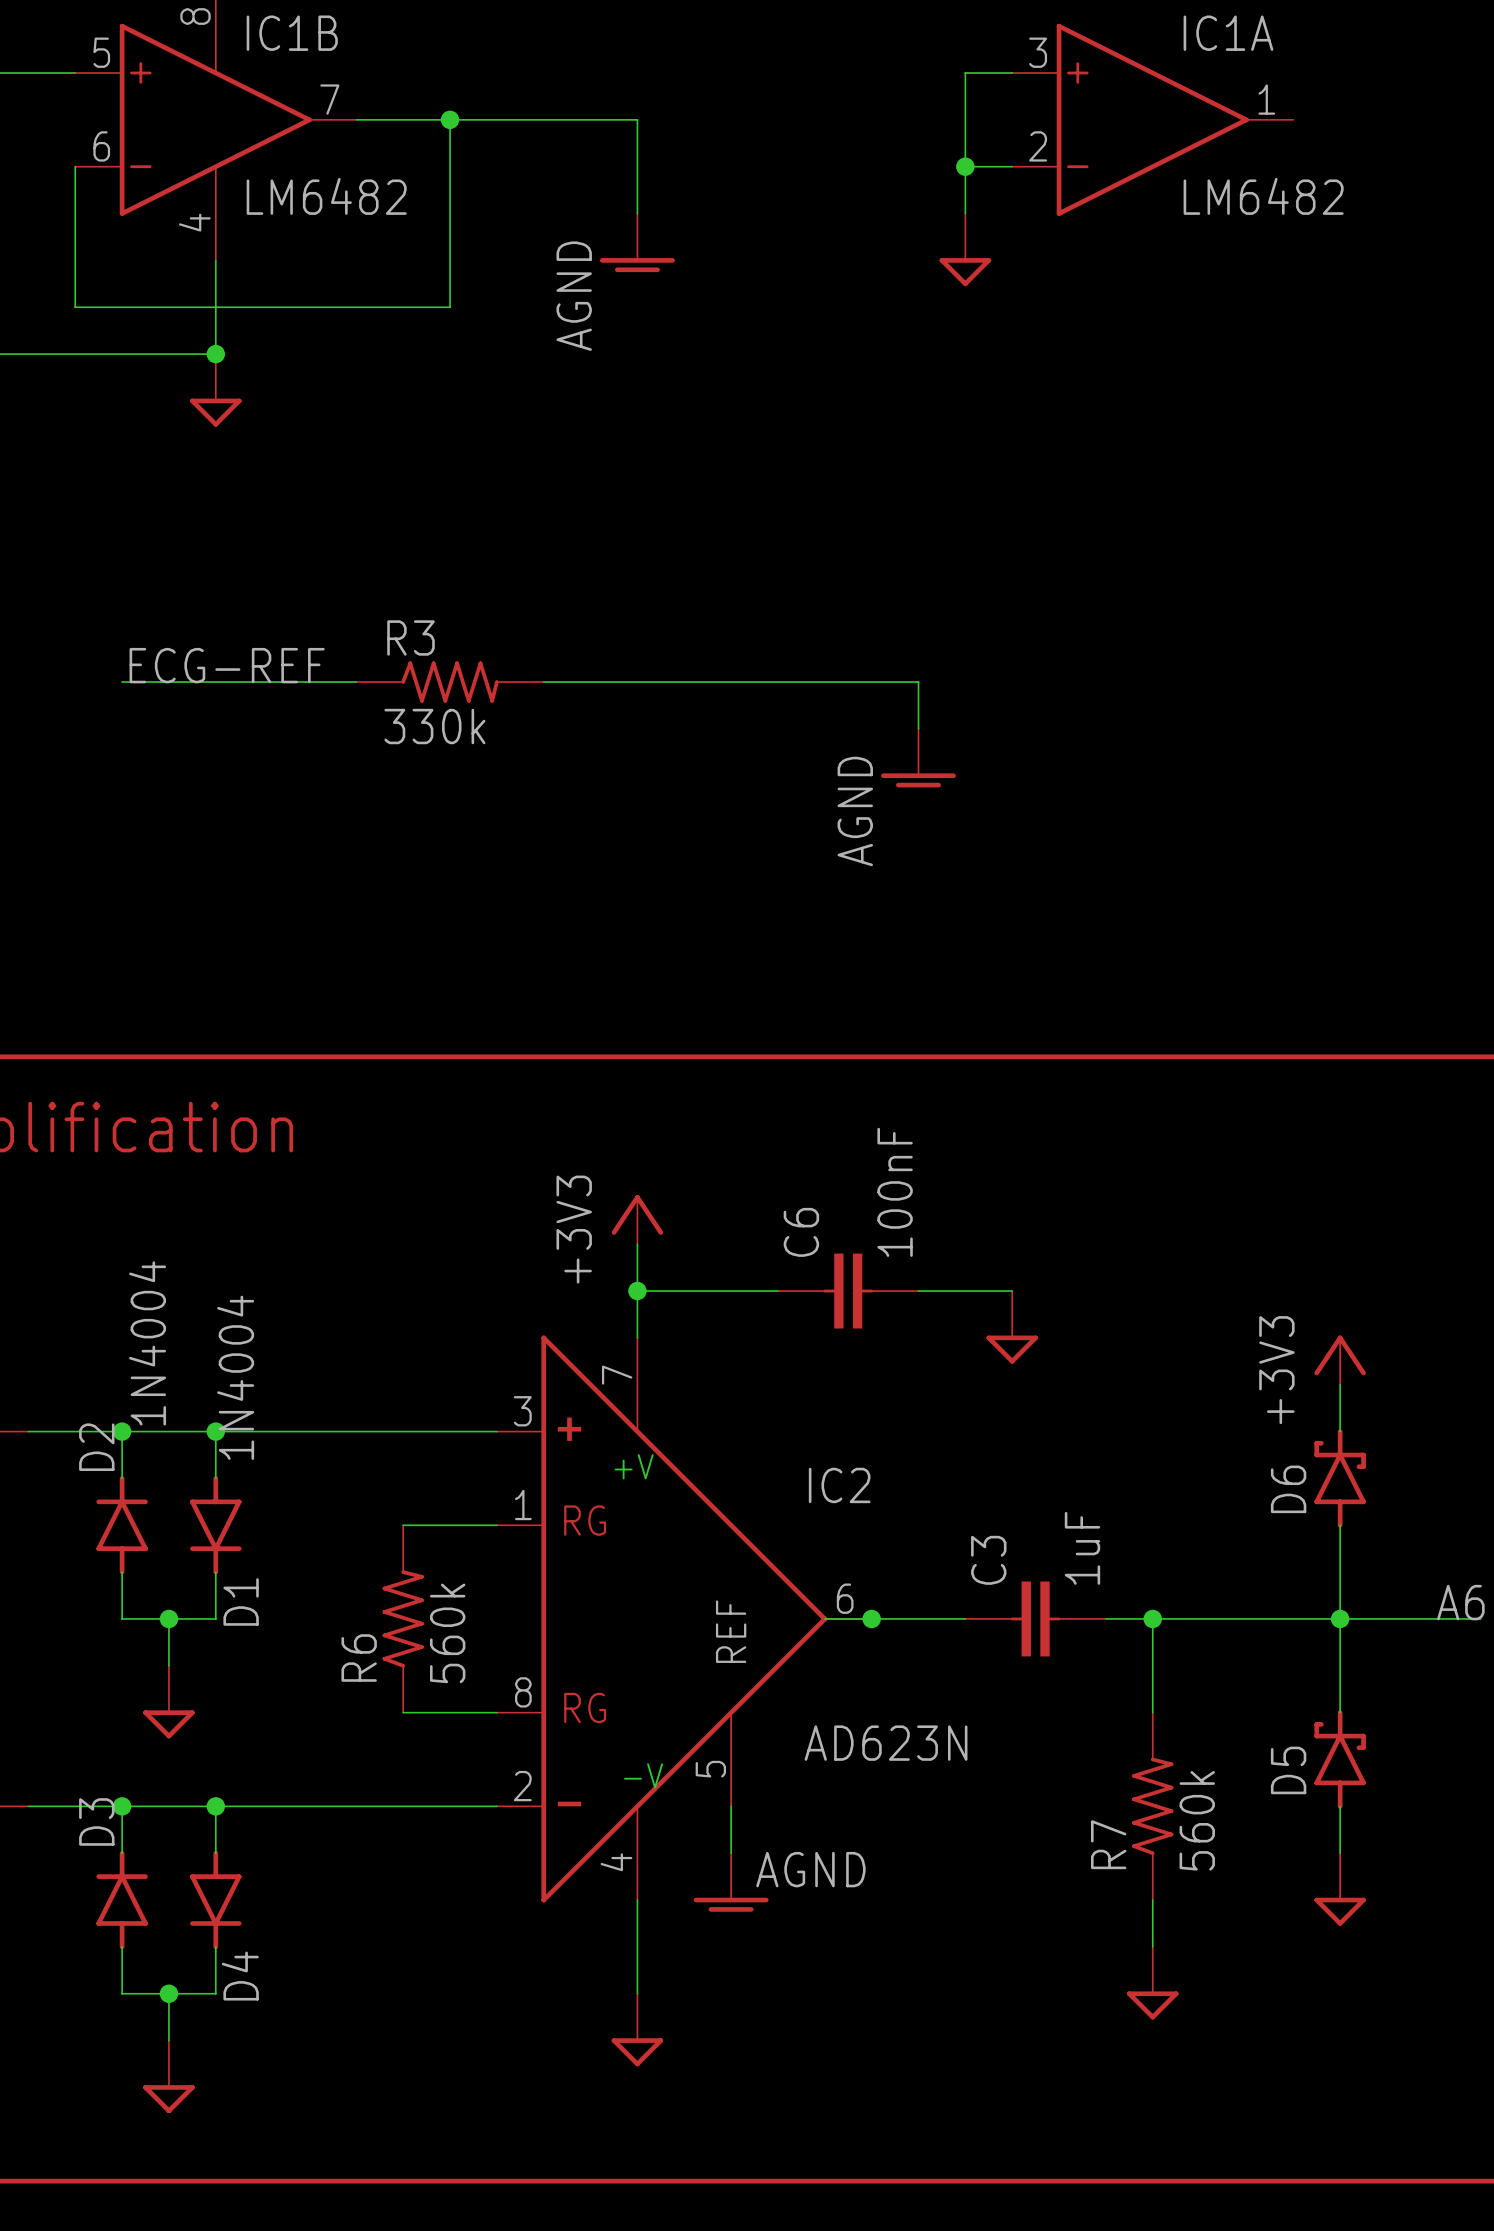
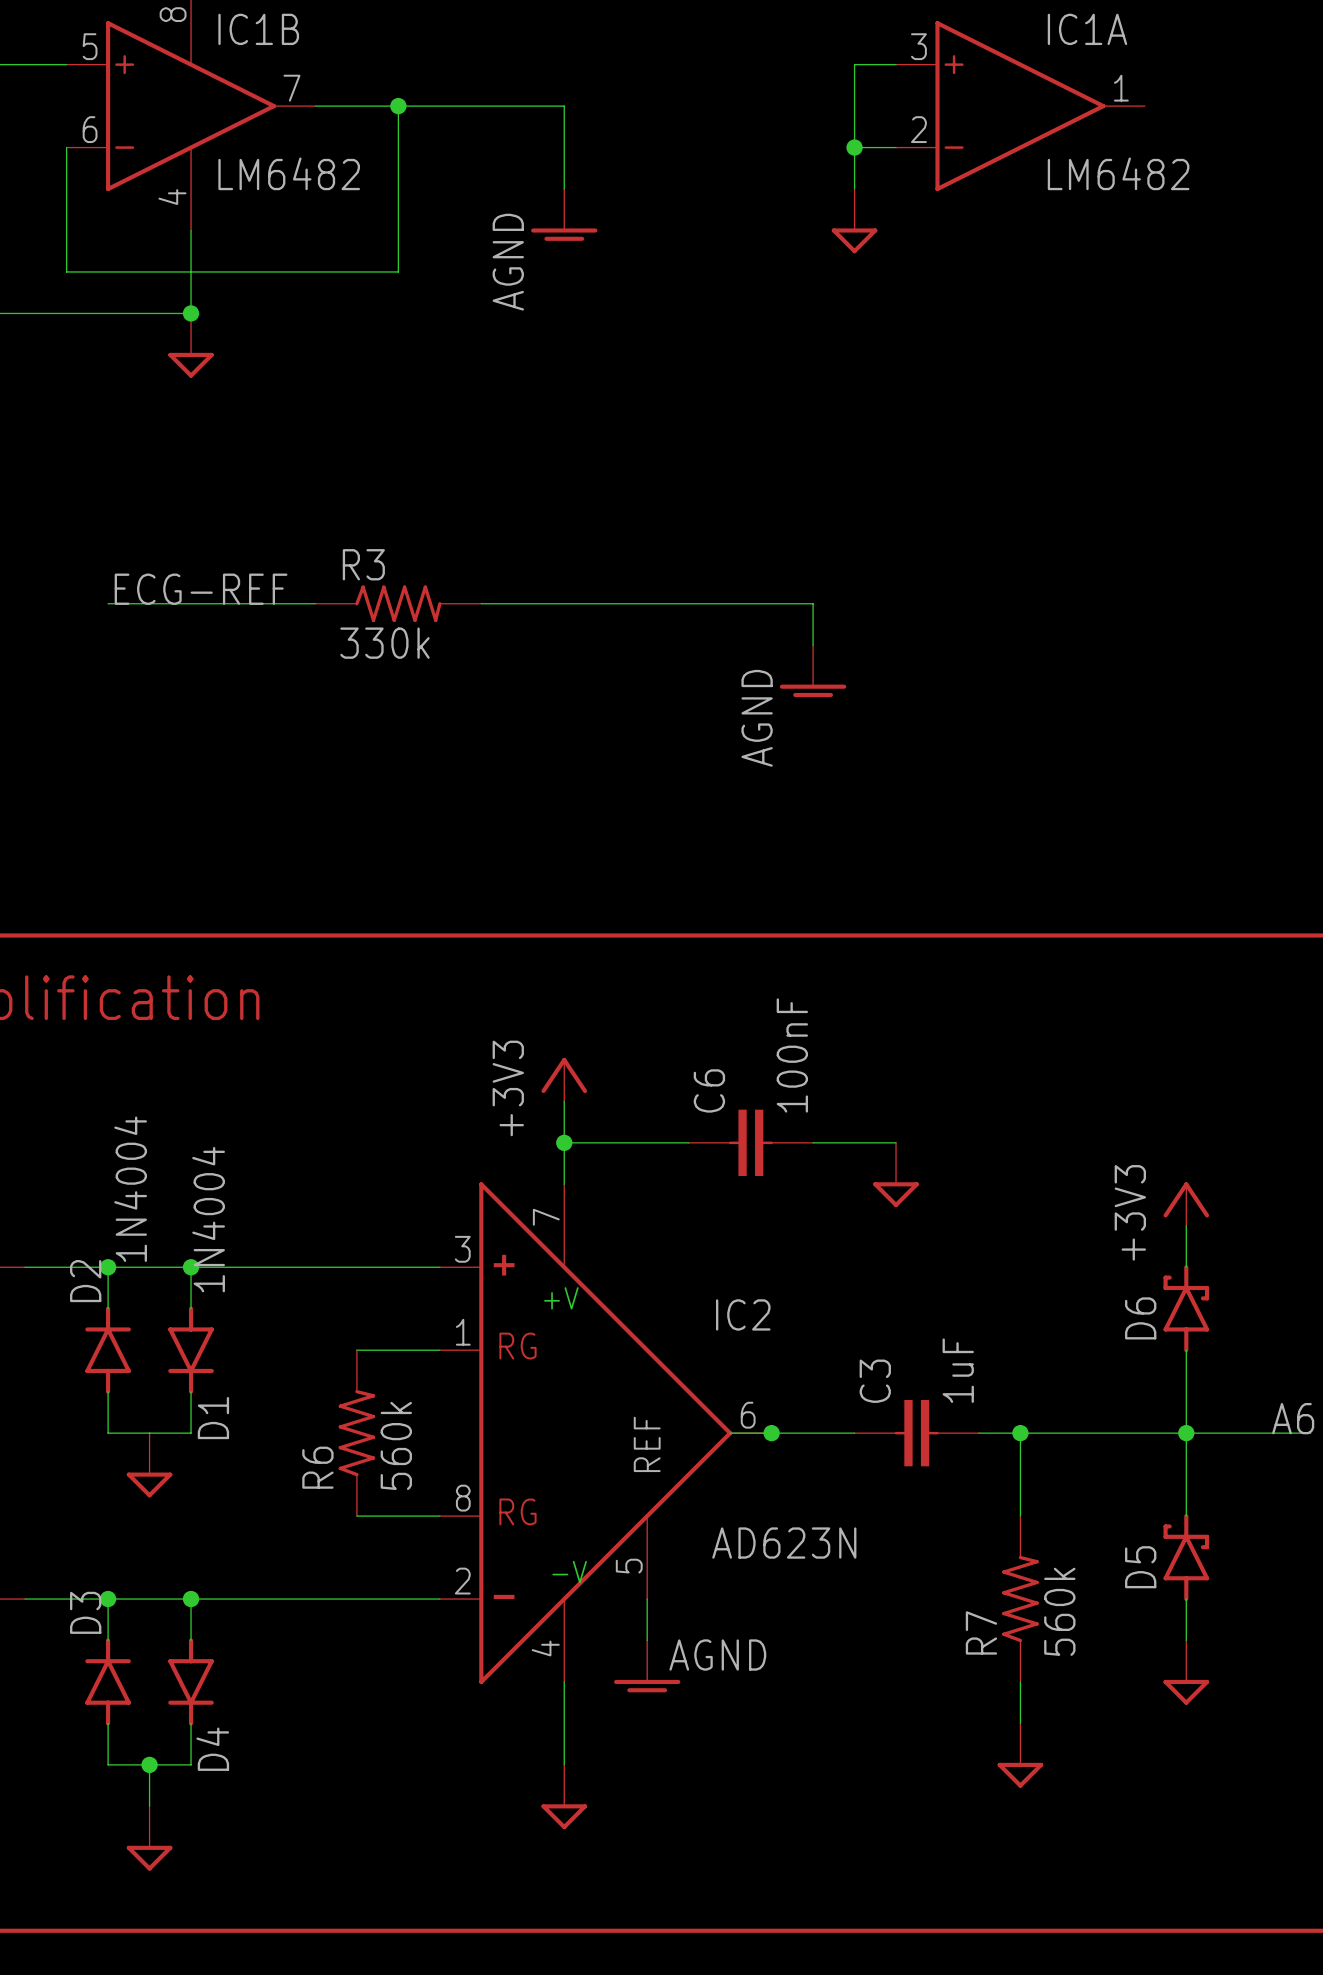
junction: (168, 1618) -> none
power symbol position: (168, 1702) -> (149, 1465)

